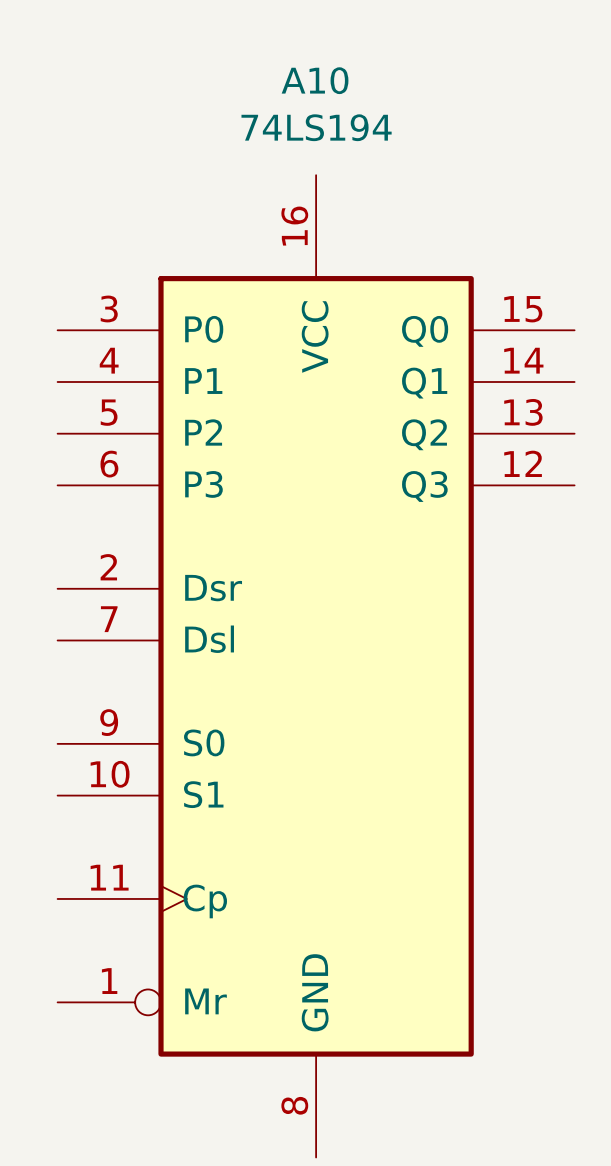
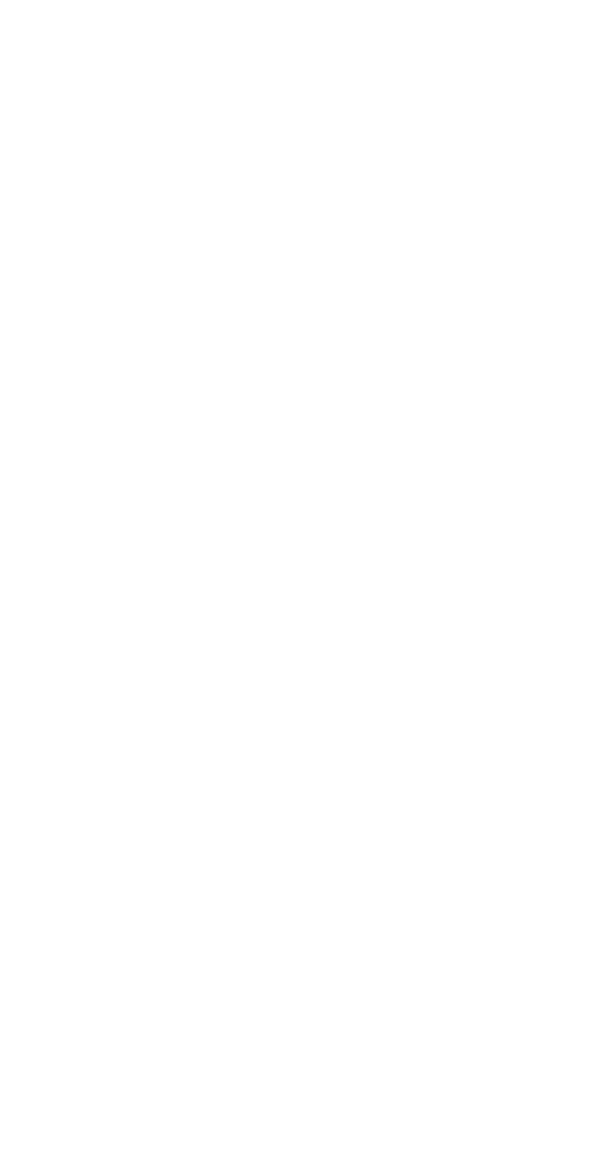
A10: 74LS194 (316, 666) -> none

